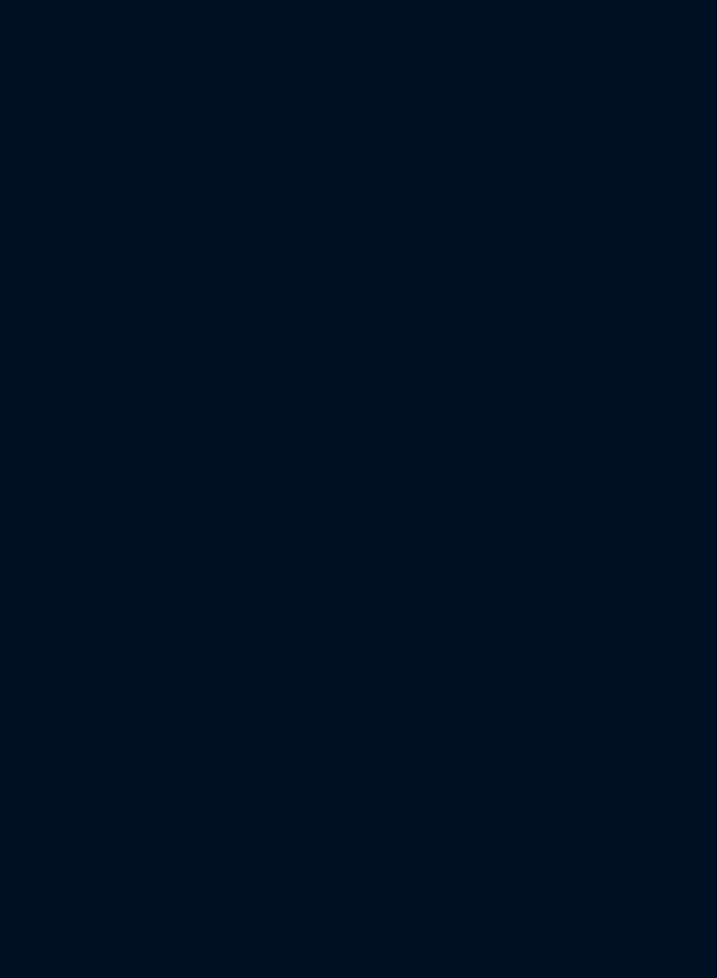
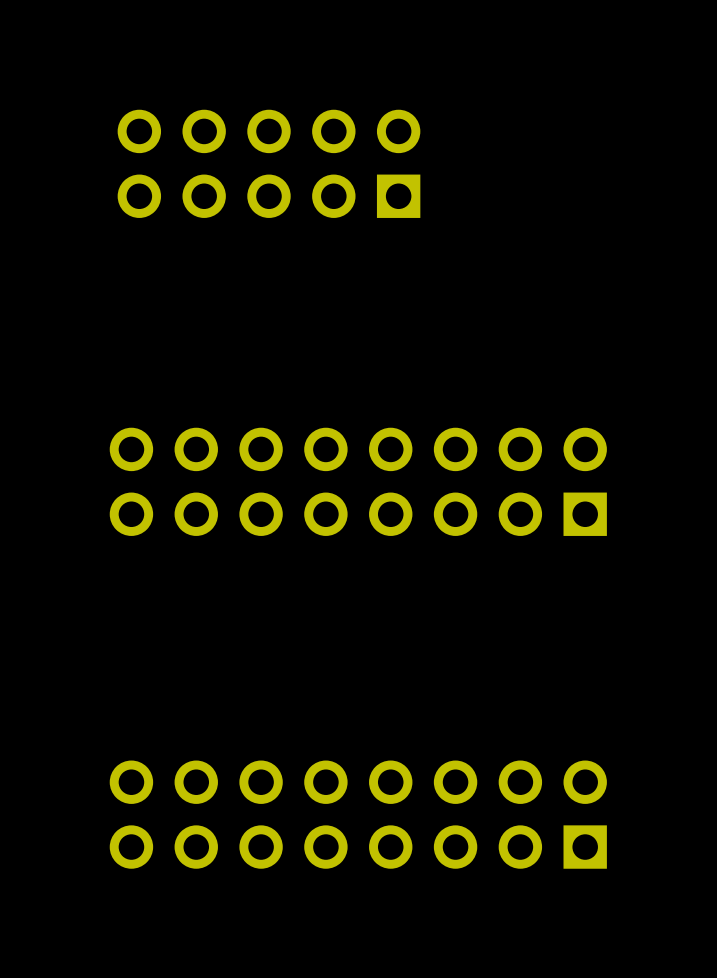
part: none -> (268, 163)
part: none -> (358, 481)
part: none -> (358, 814)

